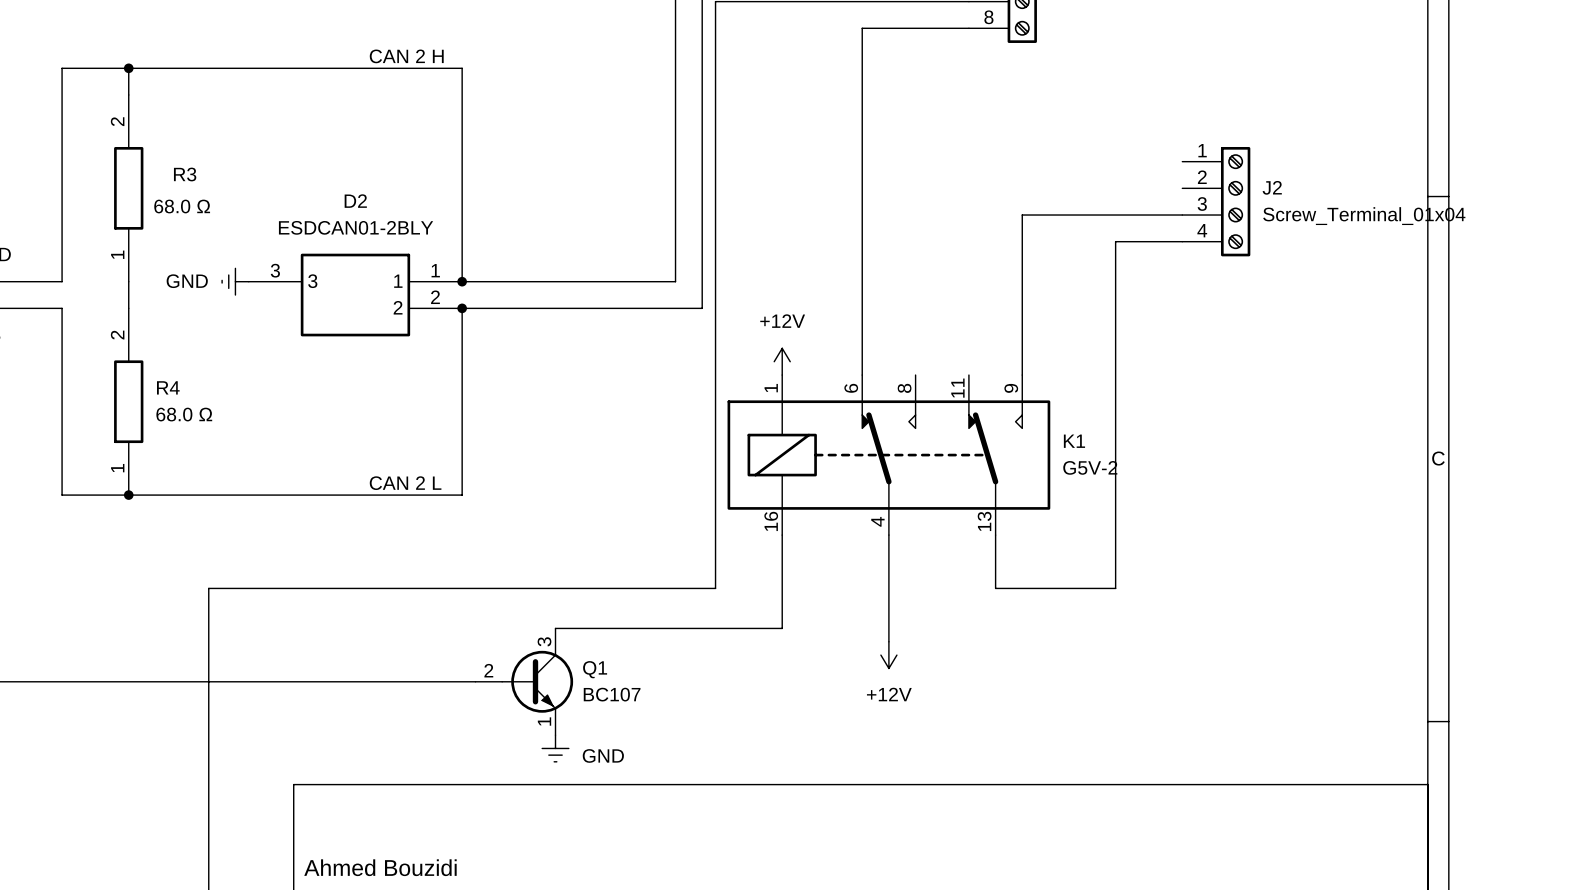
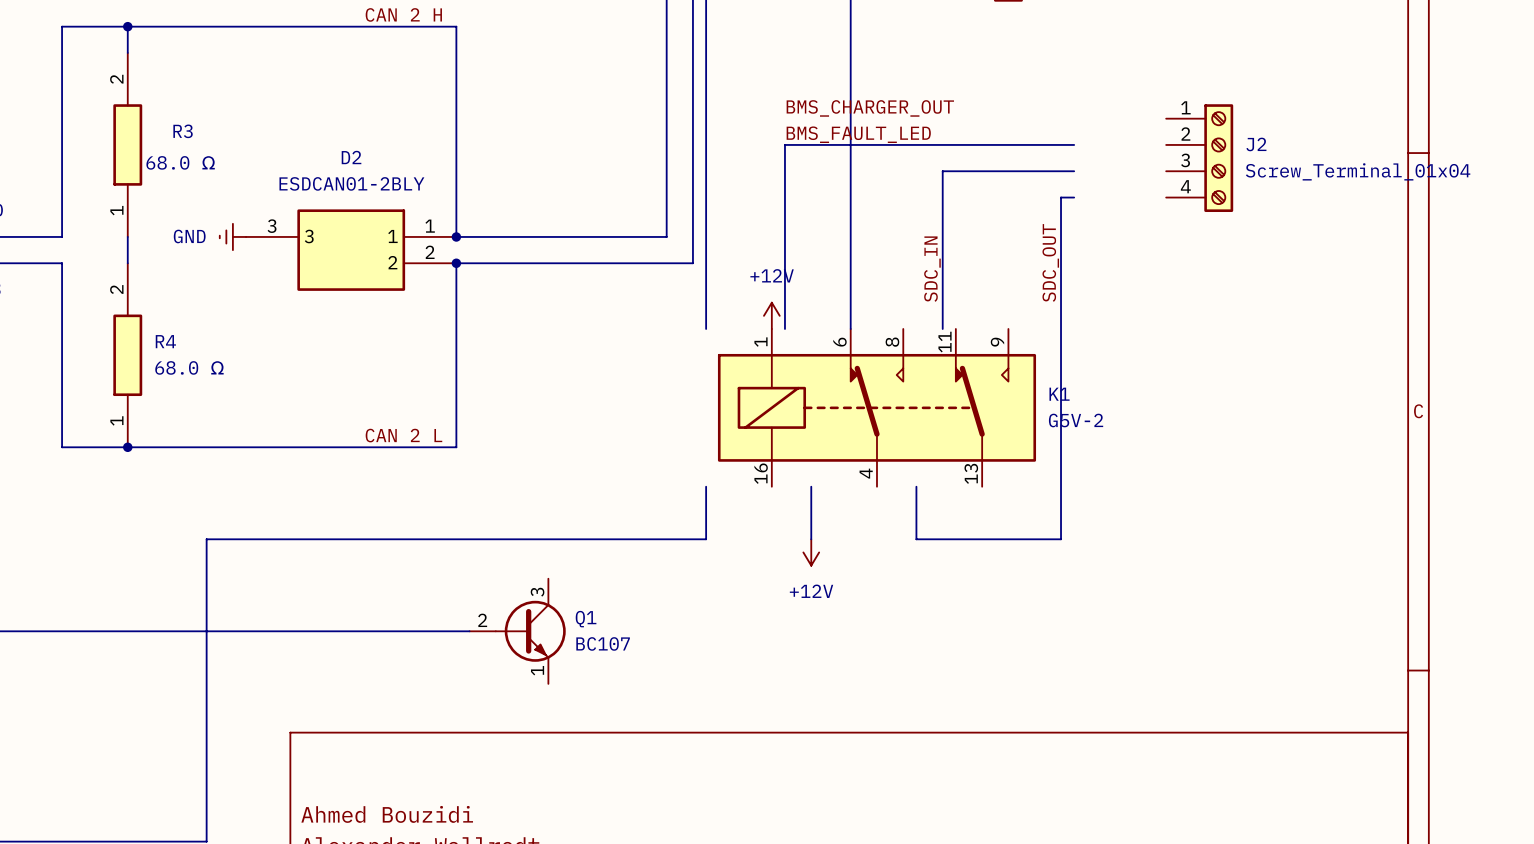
label: none -> BMS_CHARGER_OUT (870, 108)
label: none -> BMS_FAULT_LED (858, 134)
wire: none -> (1074, 144) (784, 144) (784, 328)
wire: (1022, 215) (1022, 375) -> (1008, 171) (942, 171) (942, 328)
wire: (1088, 215) (1182, 215) -> none
wire: (1182, 241) (1115, 241) (1115, 588) (1075, 588) -> (1074, 197) (1061, 197) (1061, 539)
label: none -> SDC_OUT (1050, 262)
label: none -> SDC_IN (932, 269)
wire: (715, 375) (715, 535) -> none
wire: (782, 535) (782, 628) (555, 628) -> none
wire: none -> (811, 486) (811, 539)
wire: (888, 535) (888, 641) -> none
wire: (995, 535) (995, 588) -> (916, 486) (916, 539) (982, 539)
power symbol position: +12V (888, 655) -> +12V (811, 552)
power symbol: GND (555, 748) -> none

